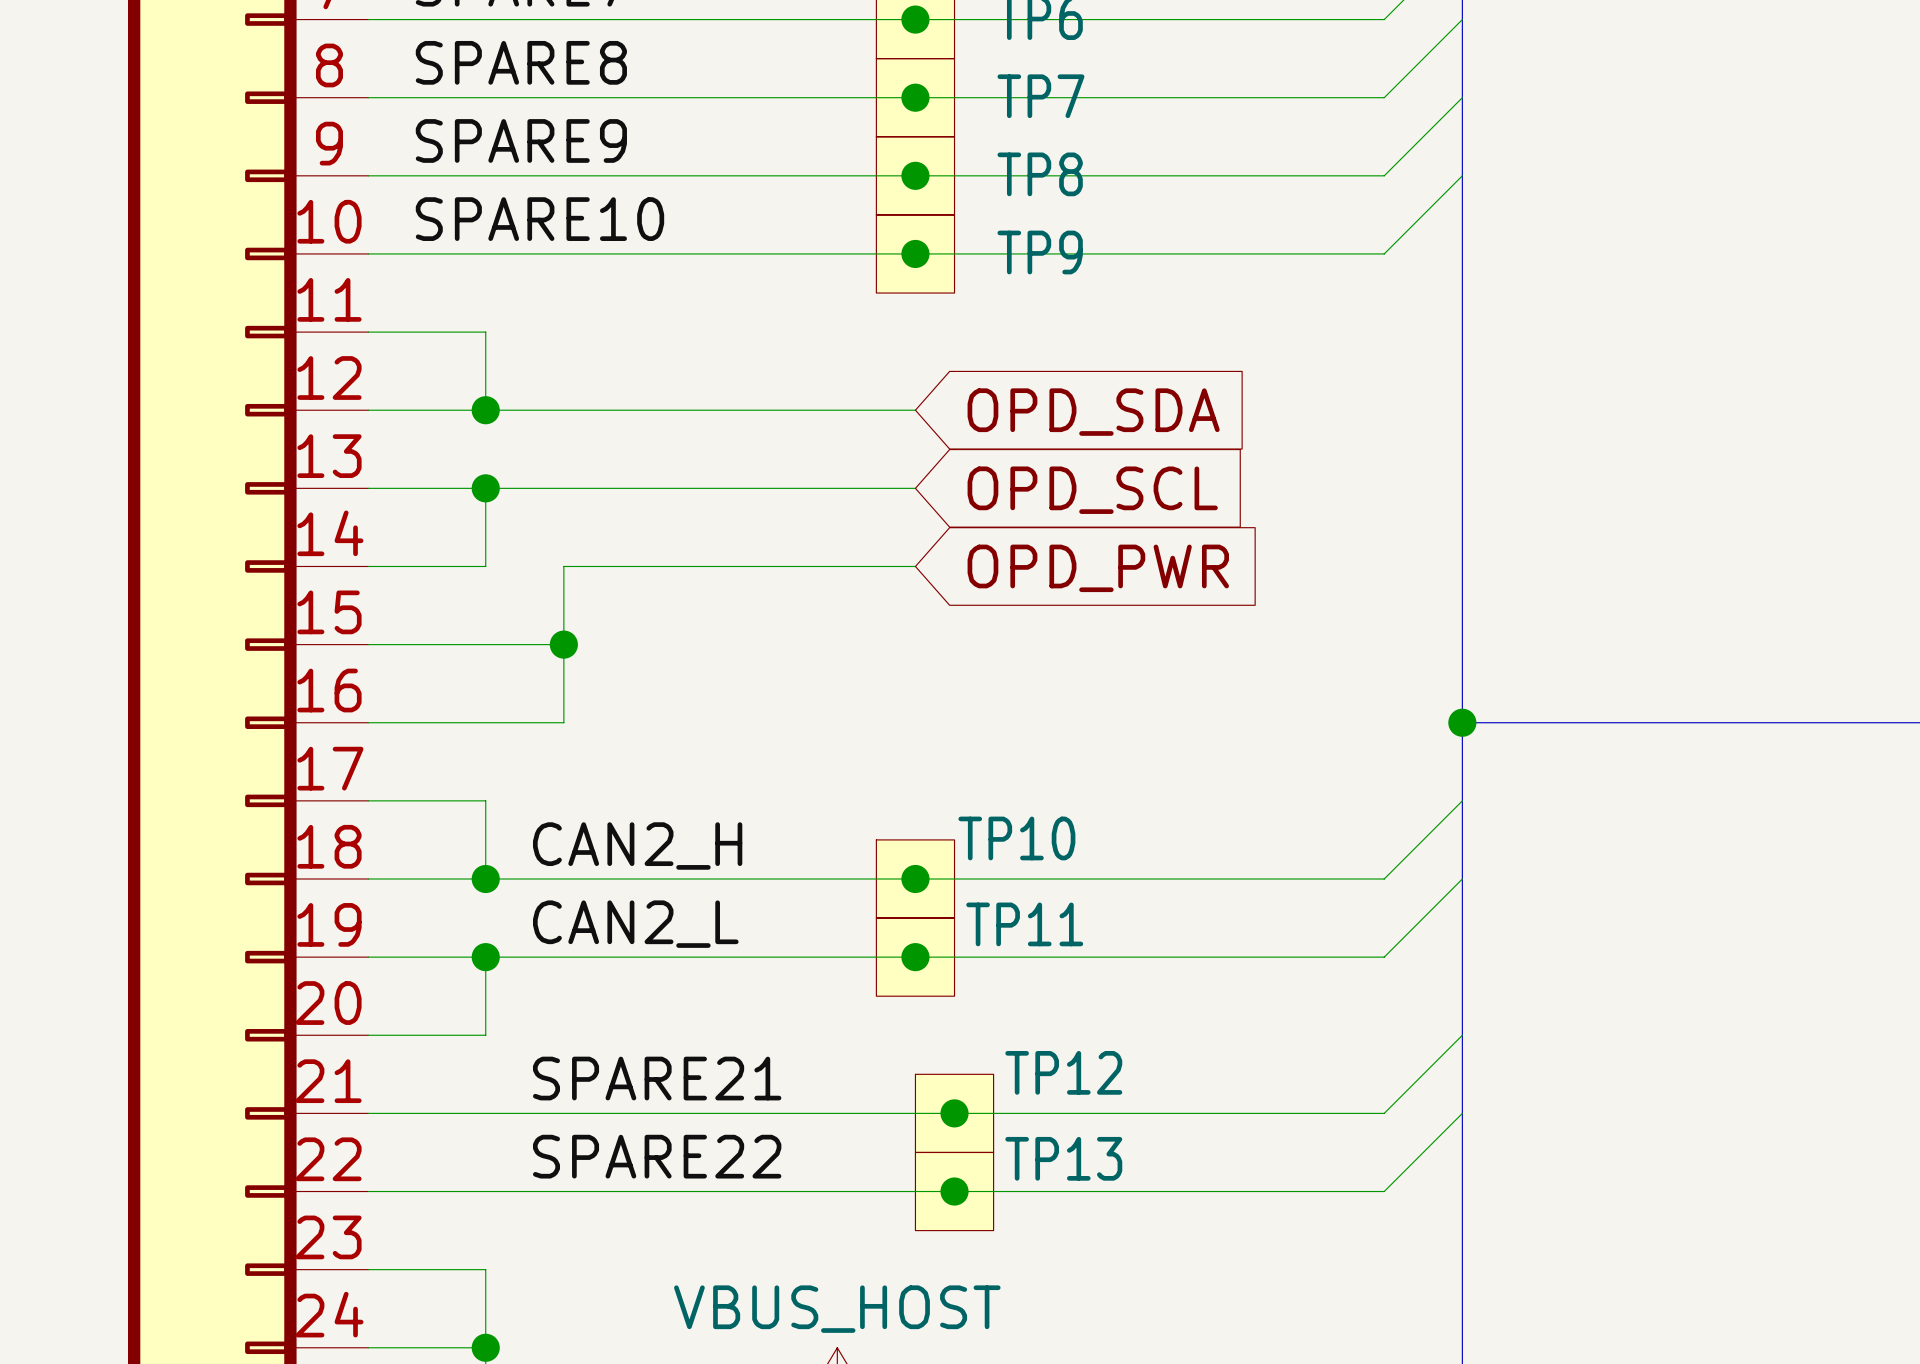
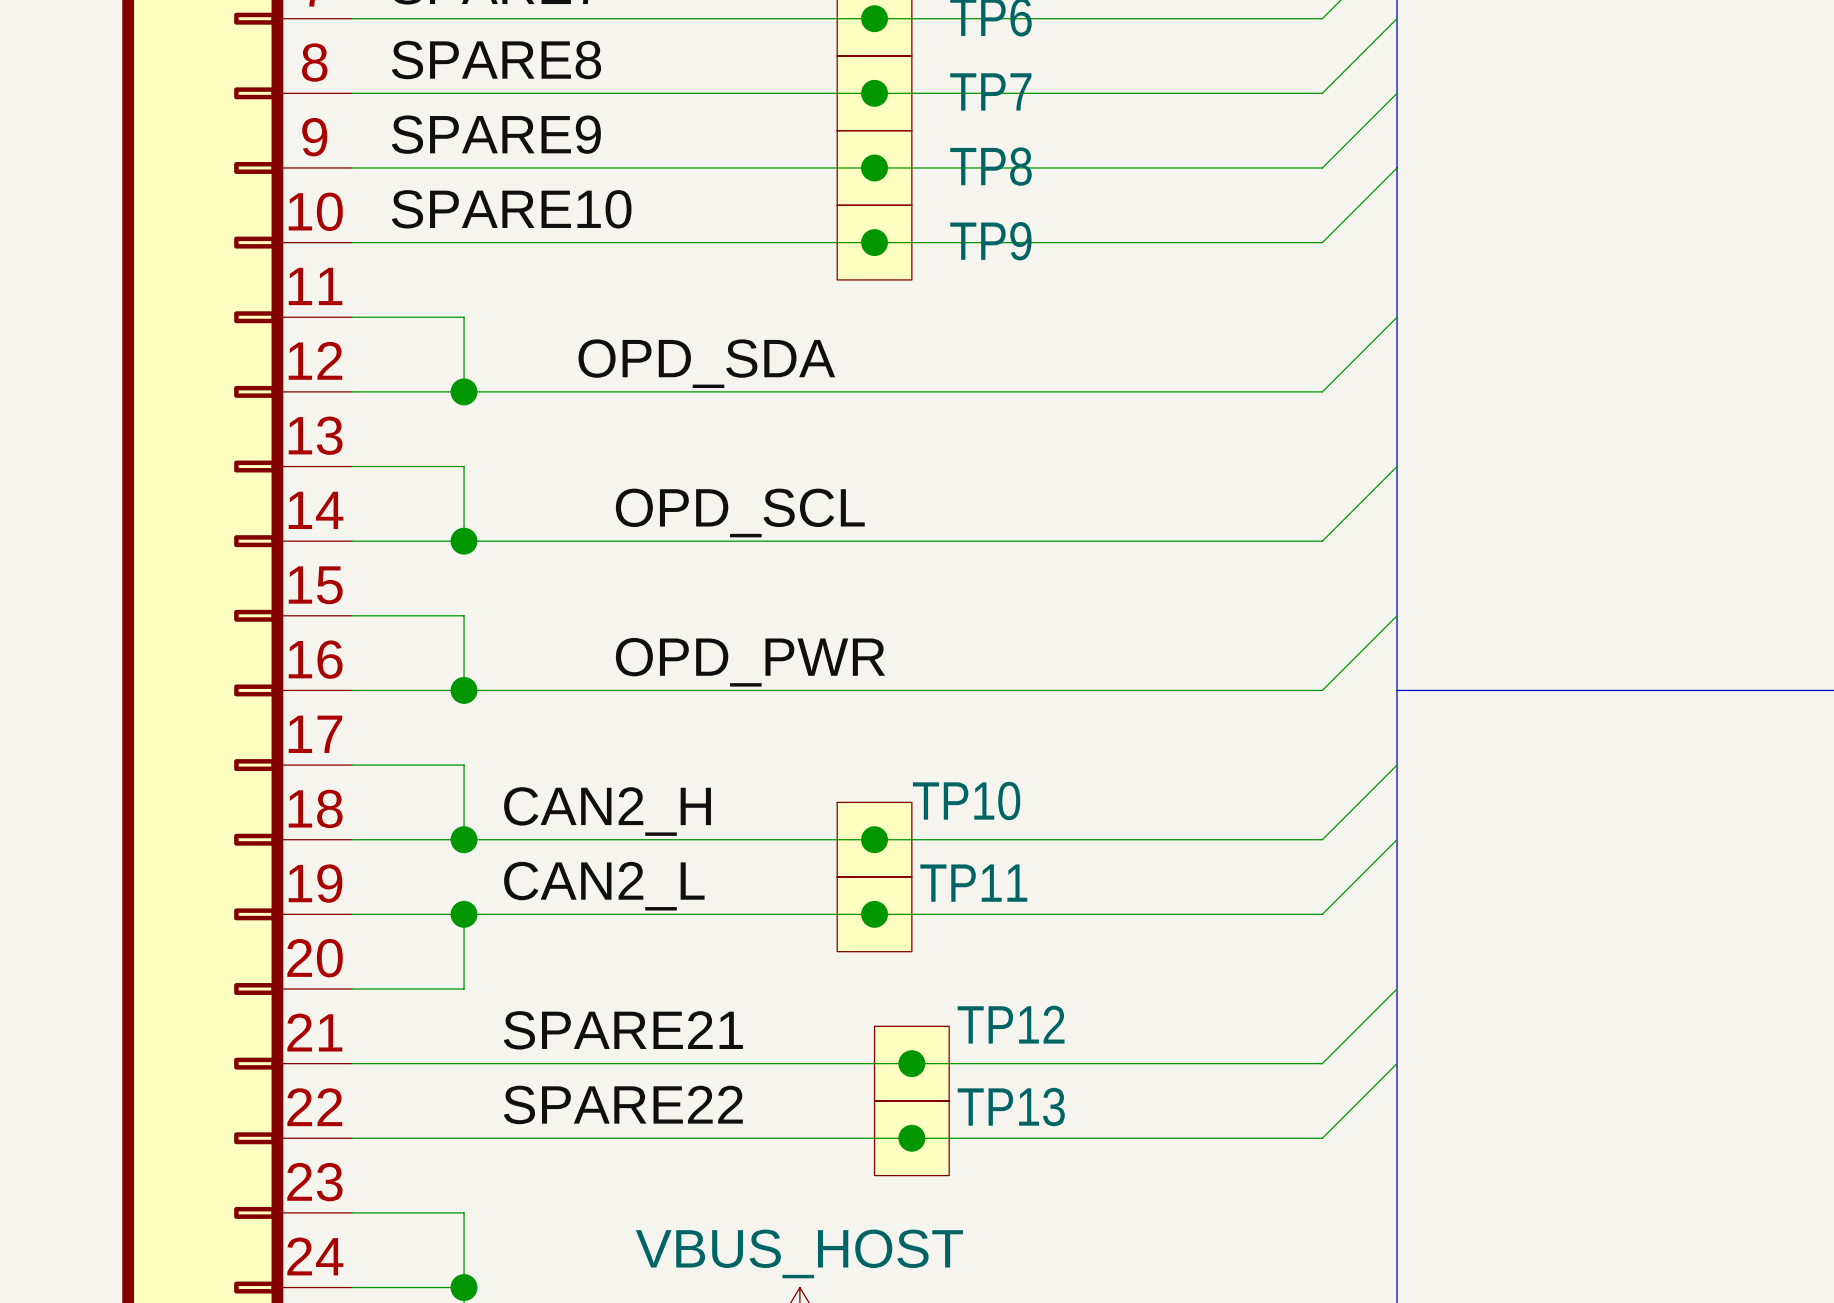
wire: none -> (1397, 317) (1322, 391) (874, 391)
label: none -> OPD_SDA (706, 363)
global label: OPD_SDA (1093, 412) -> none
wire: (485, 488) (915, 488) -> none
junction: (485, 488) -> none
wire: none -> (1397, 466) (1322, 541) (874, 541)
global label: OPD_SCL (1092, 490) -> none
label: none -> OPD_SCL (740, 512)
junction: none -> (464, 541)
wire: (563, 566) (563, 722) -> (538, 541) (464, 541)
global label: OPD_PWR (1098, 568) -> none
wire: (485, 644) (563, 644) -> (464, 615) (464, 690)
junction: (563, 644) -> none
wire: none -> (1397, 615) (1322, 690) (538, 690)
label: none -> OPD_PWR (750, 662)
junction: none -> (464, 690)
junction: (1462, 722) -> none

